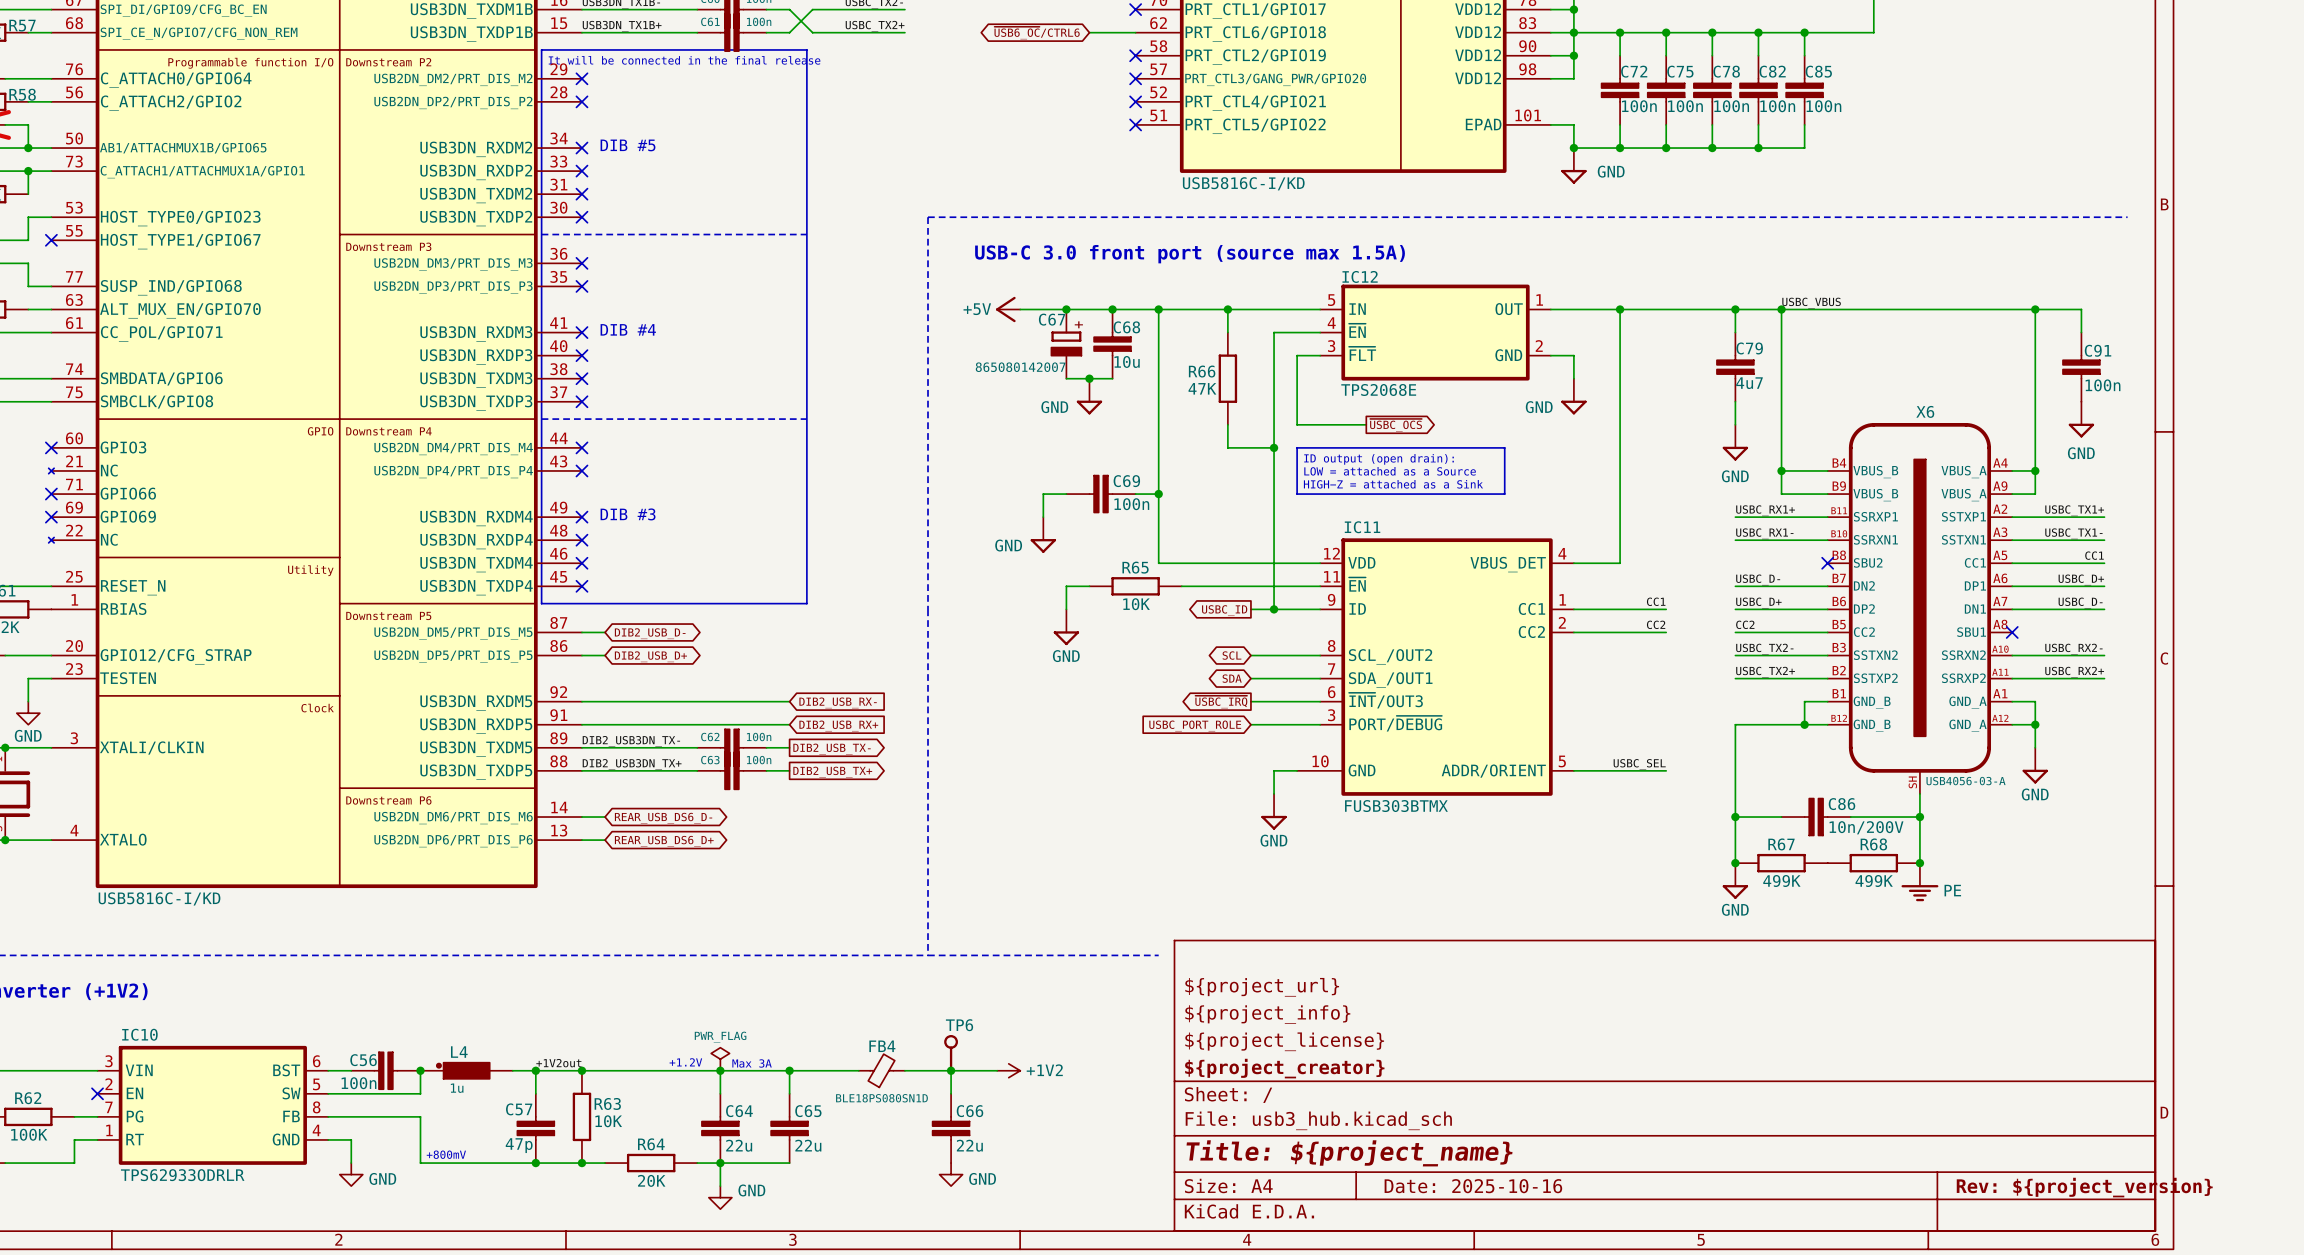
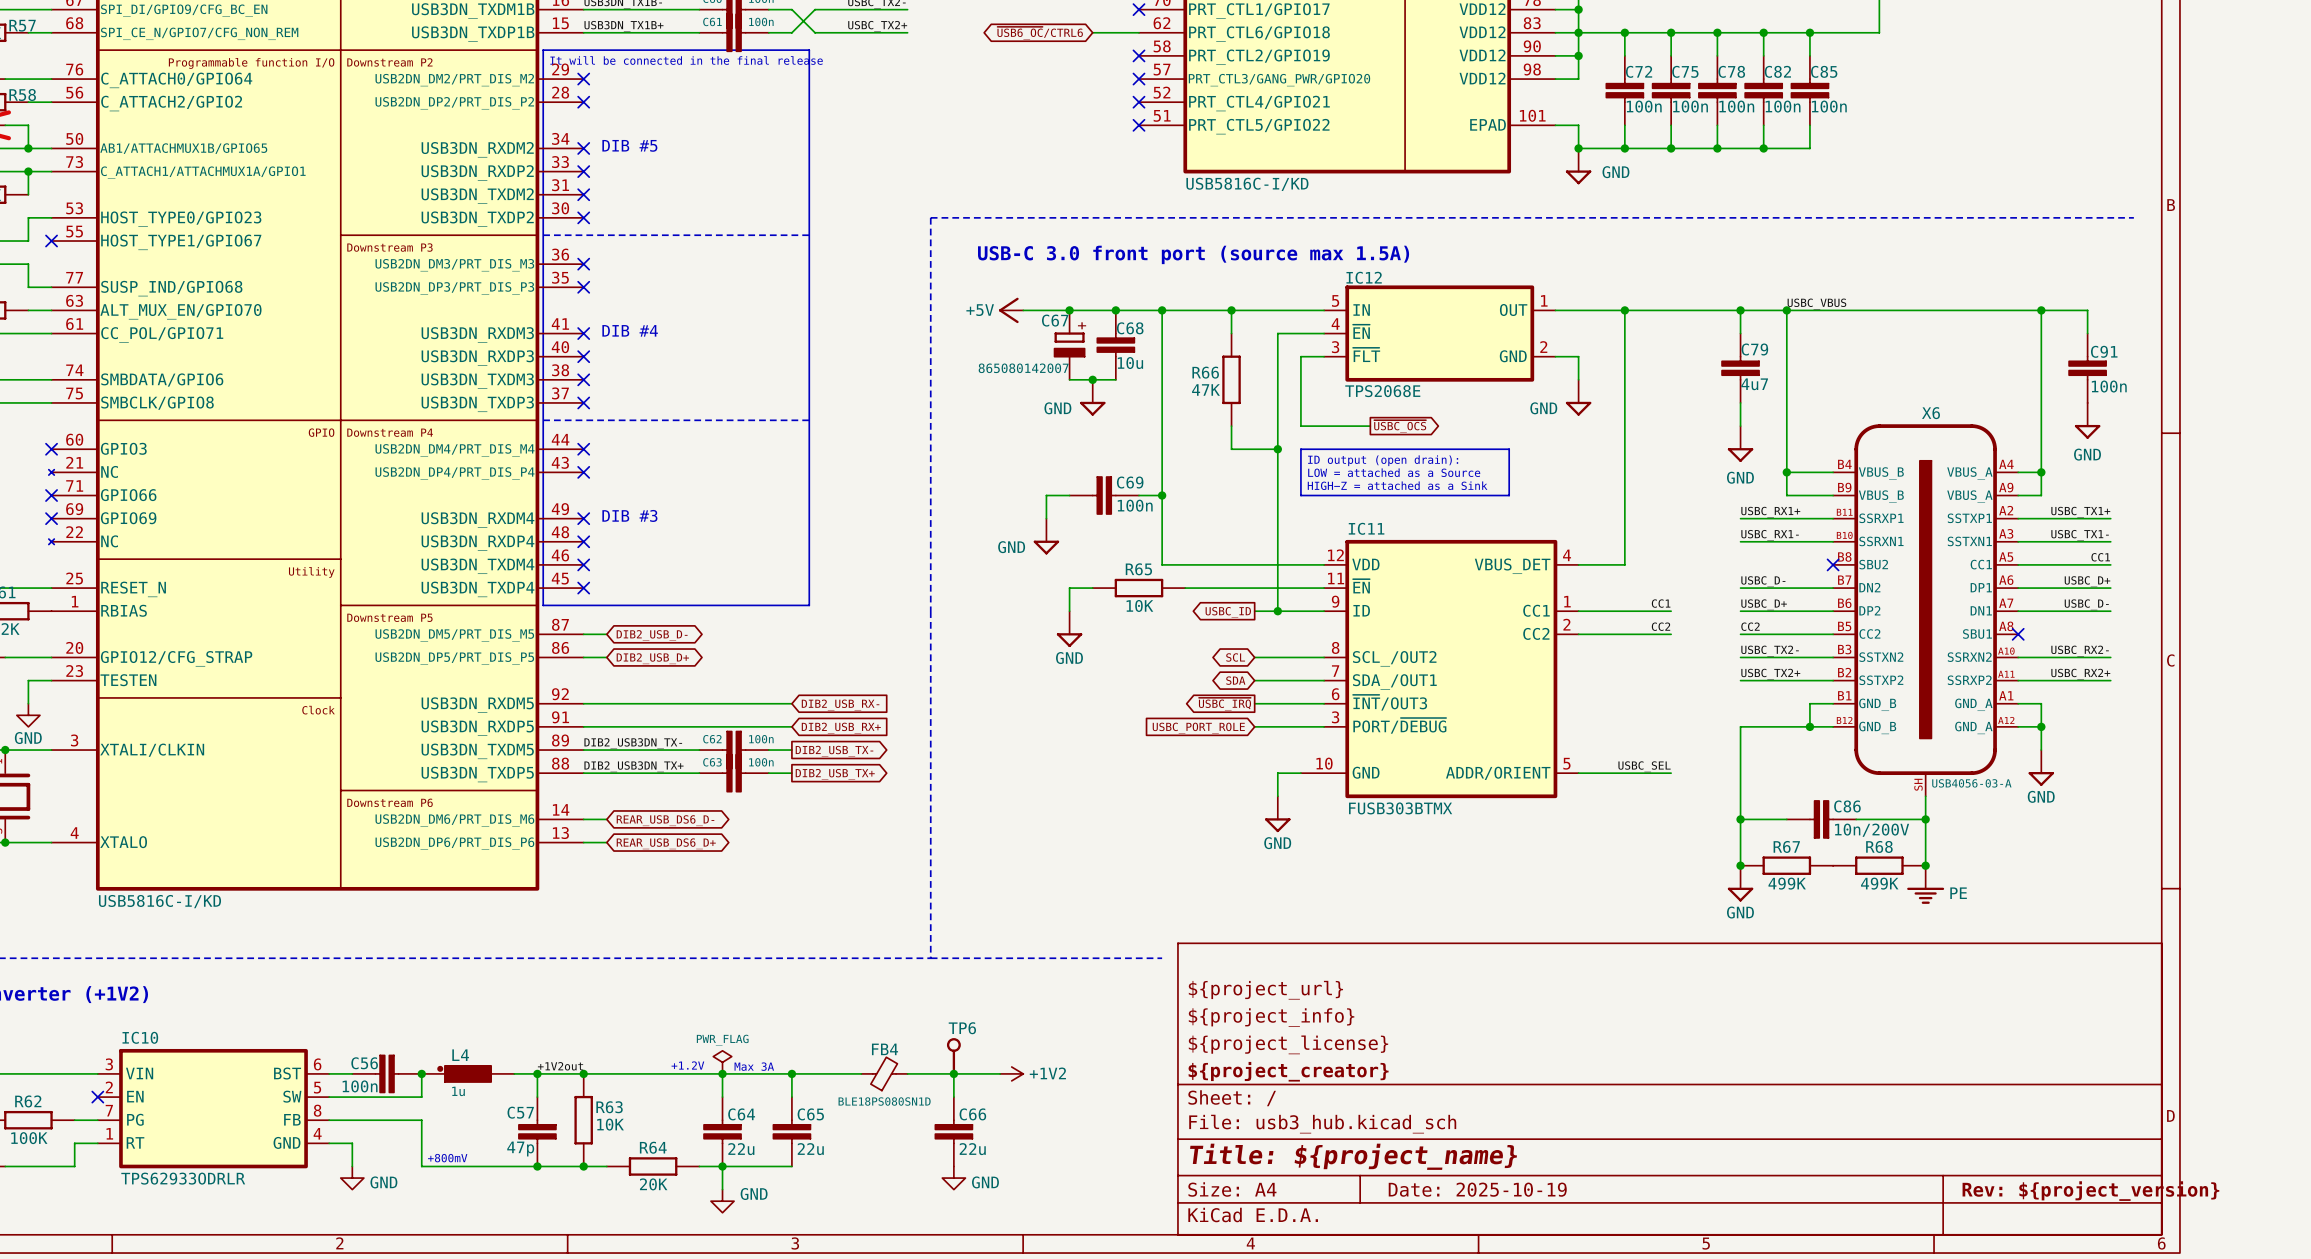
title block: Date: 2025-10-16 (1473, 1186) -> Date: 2025-10-19 (1477, 1189)

